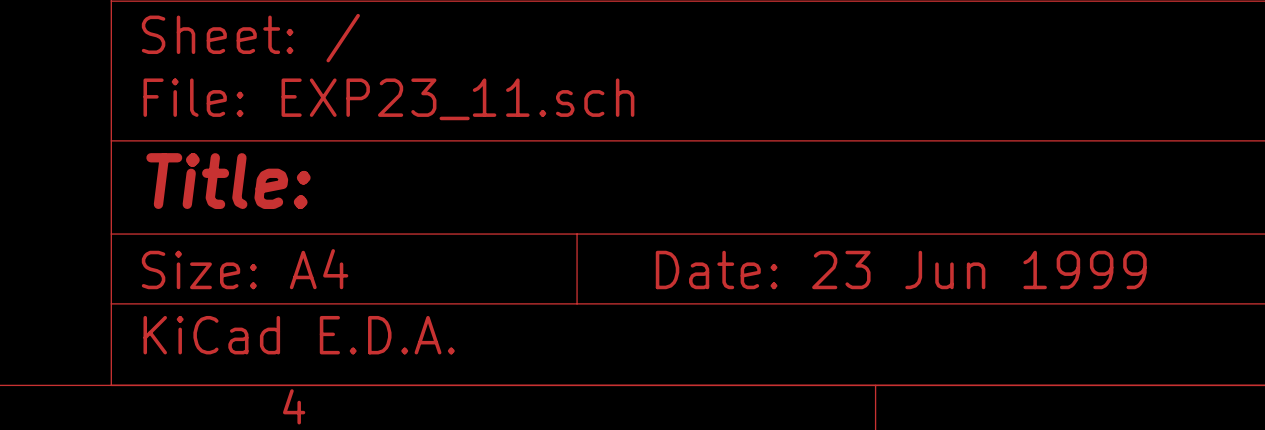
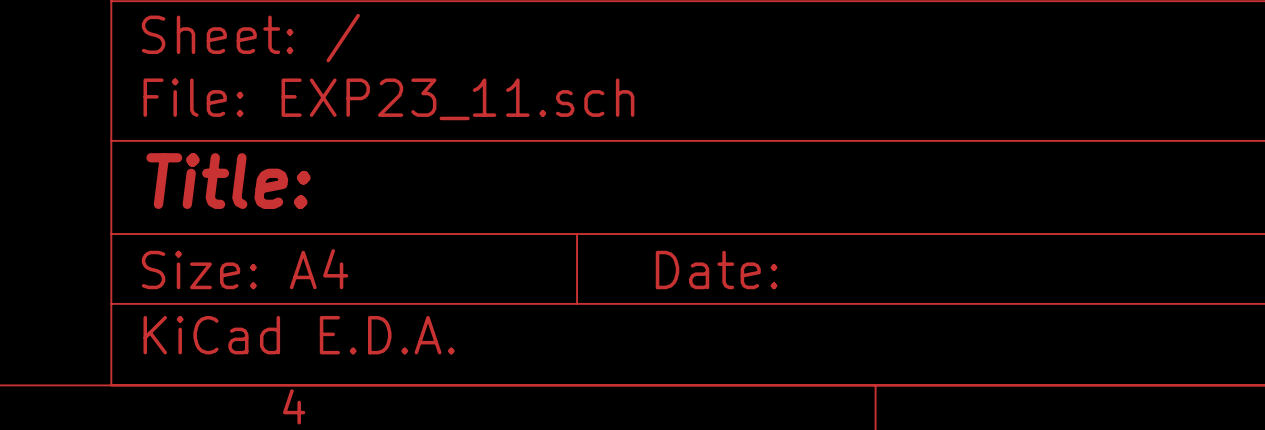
title block: Date: 23 Jun 1999 (901, 269) -> Date: (716, 269)

